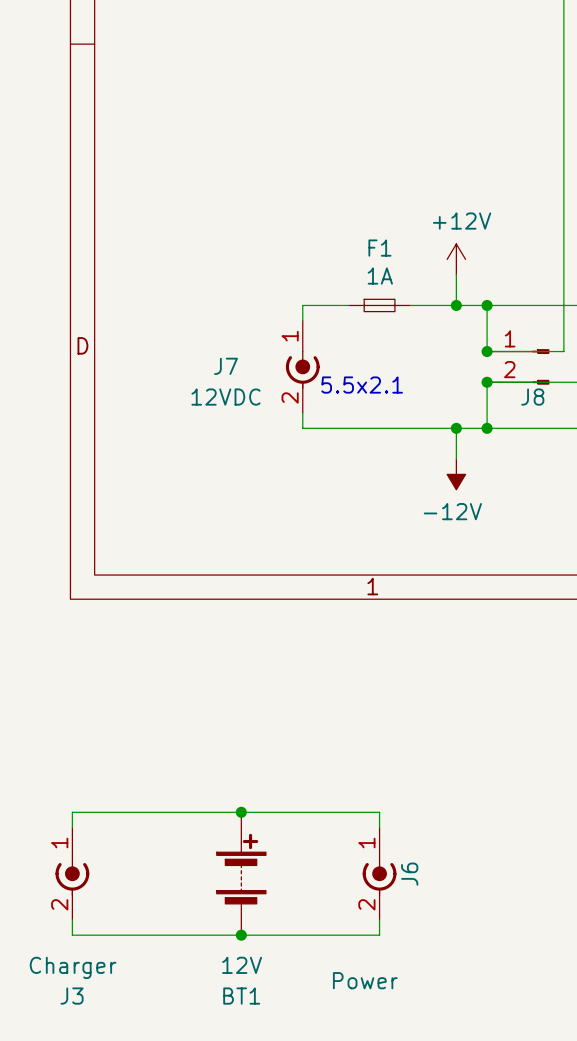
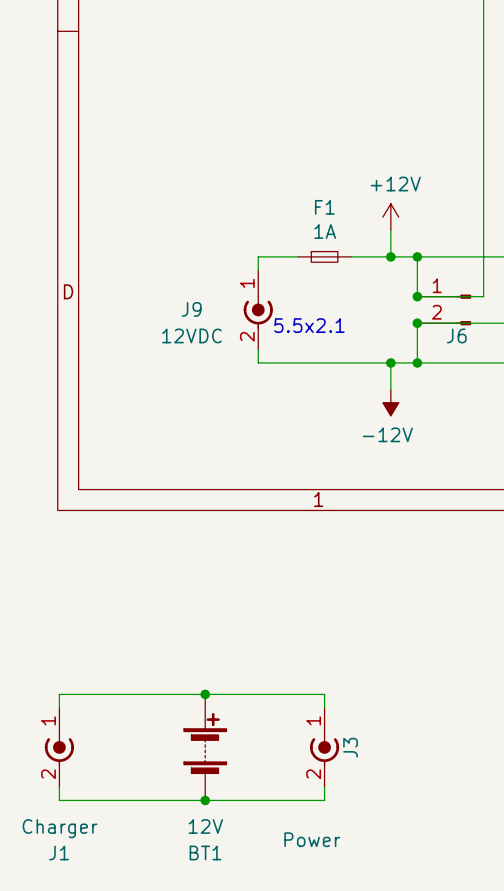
J7 name: J7 (225, 366) -> J9 (191, 309)
J8 name: J8 (532, 397) -> J6 (456, 335)
J6 name: J6 (409, 874) -> J3 (350, 747)
J3 name: J3 (72, 996) -> J1 (59, 852)

